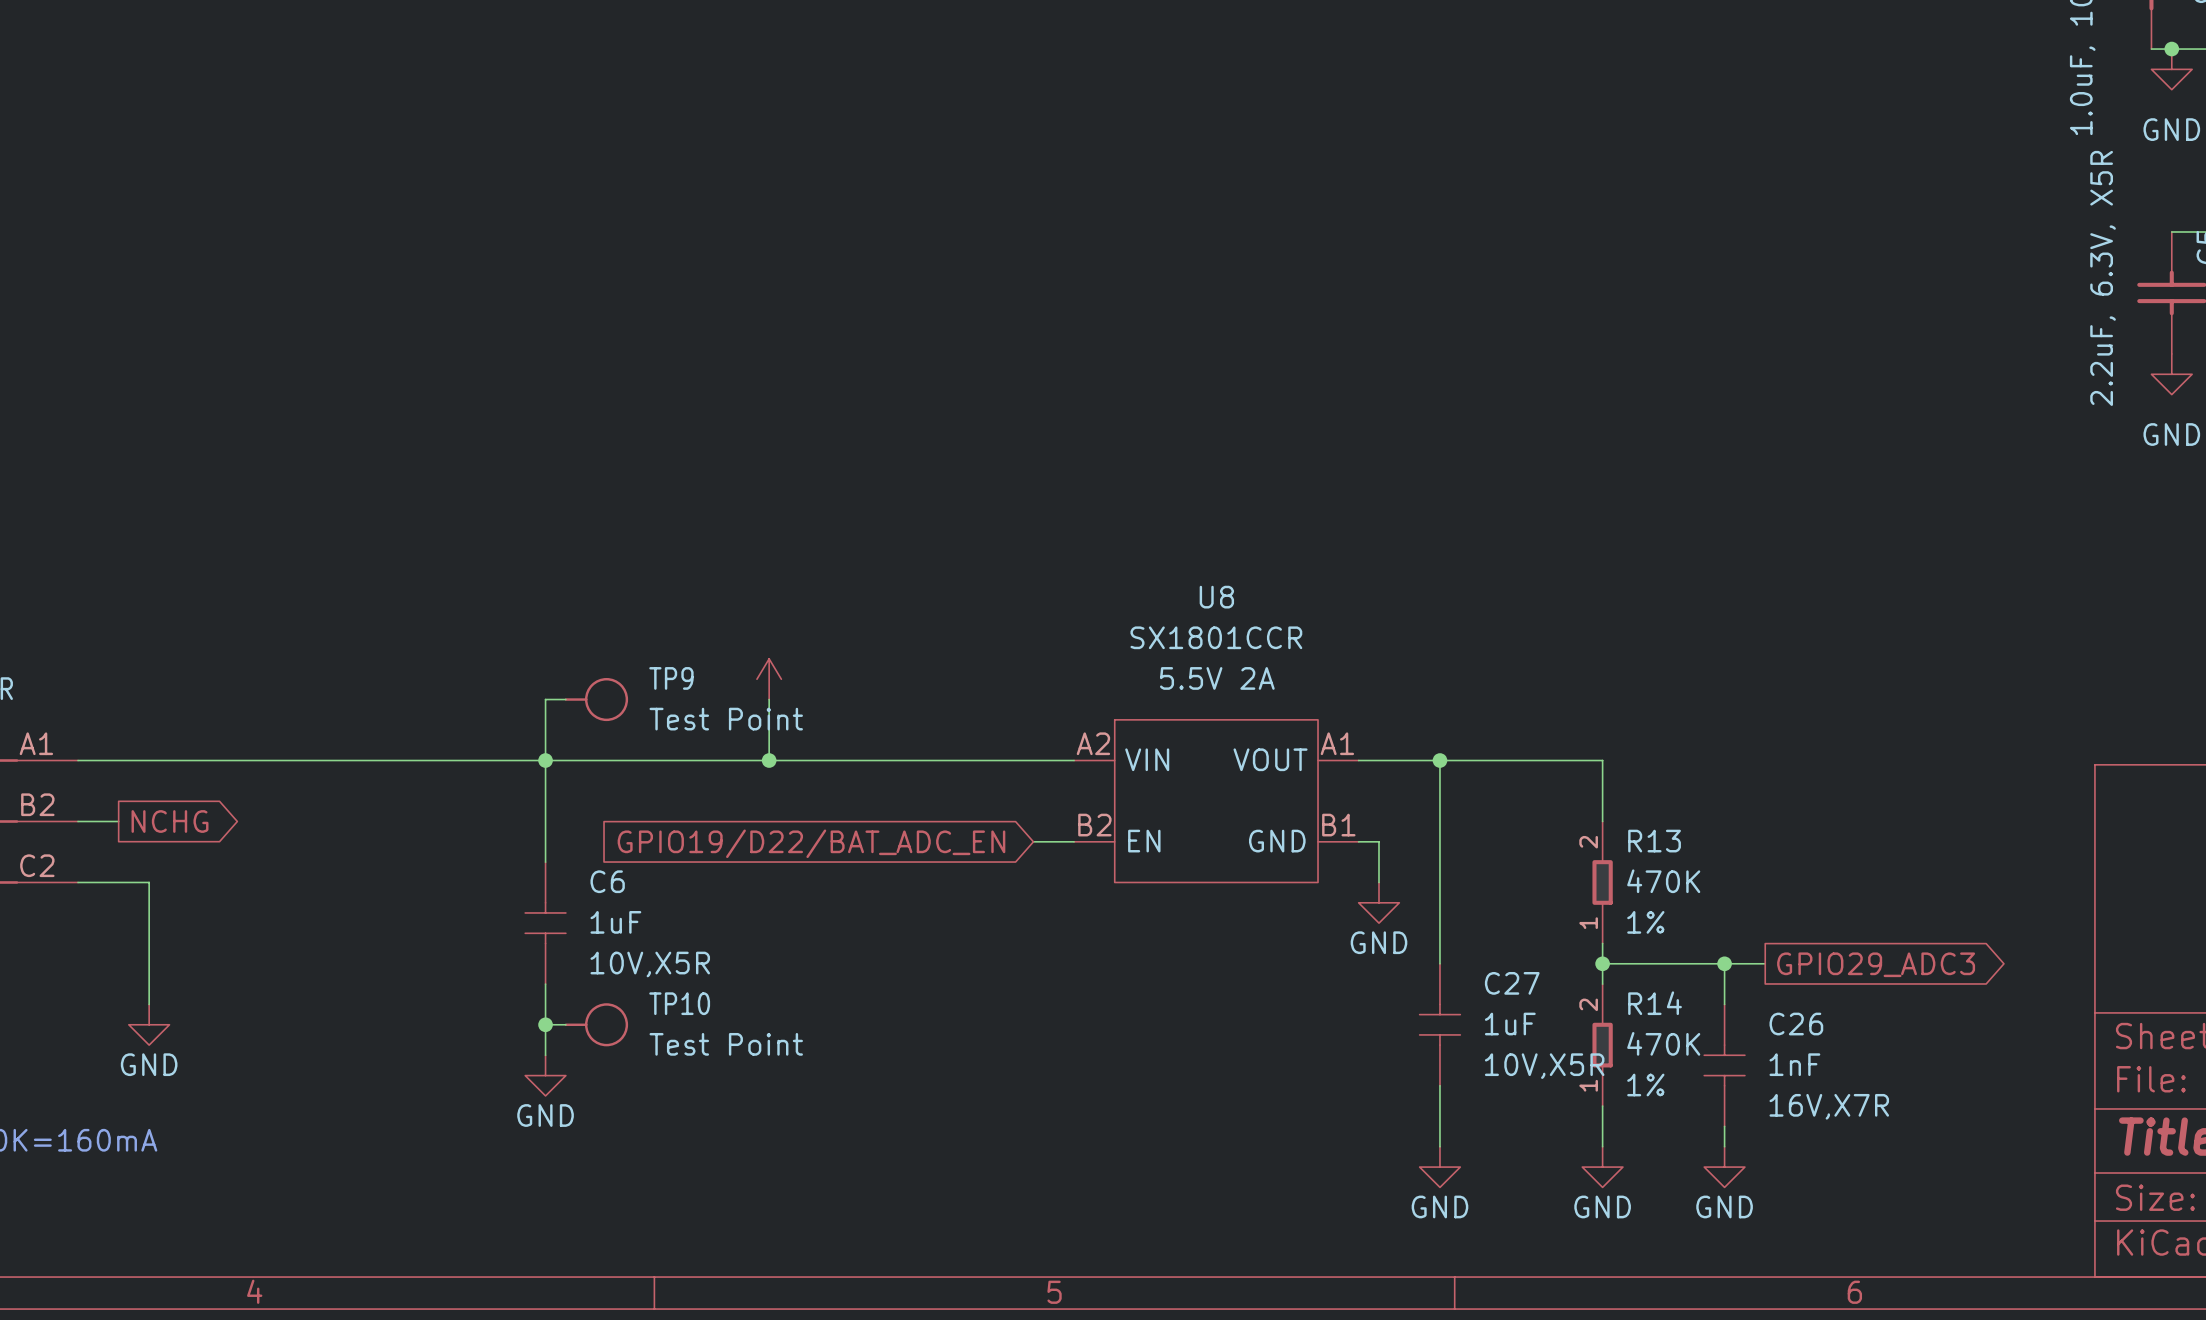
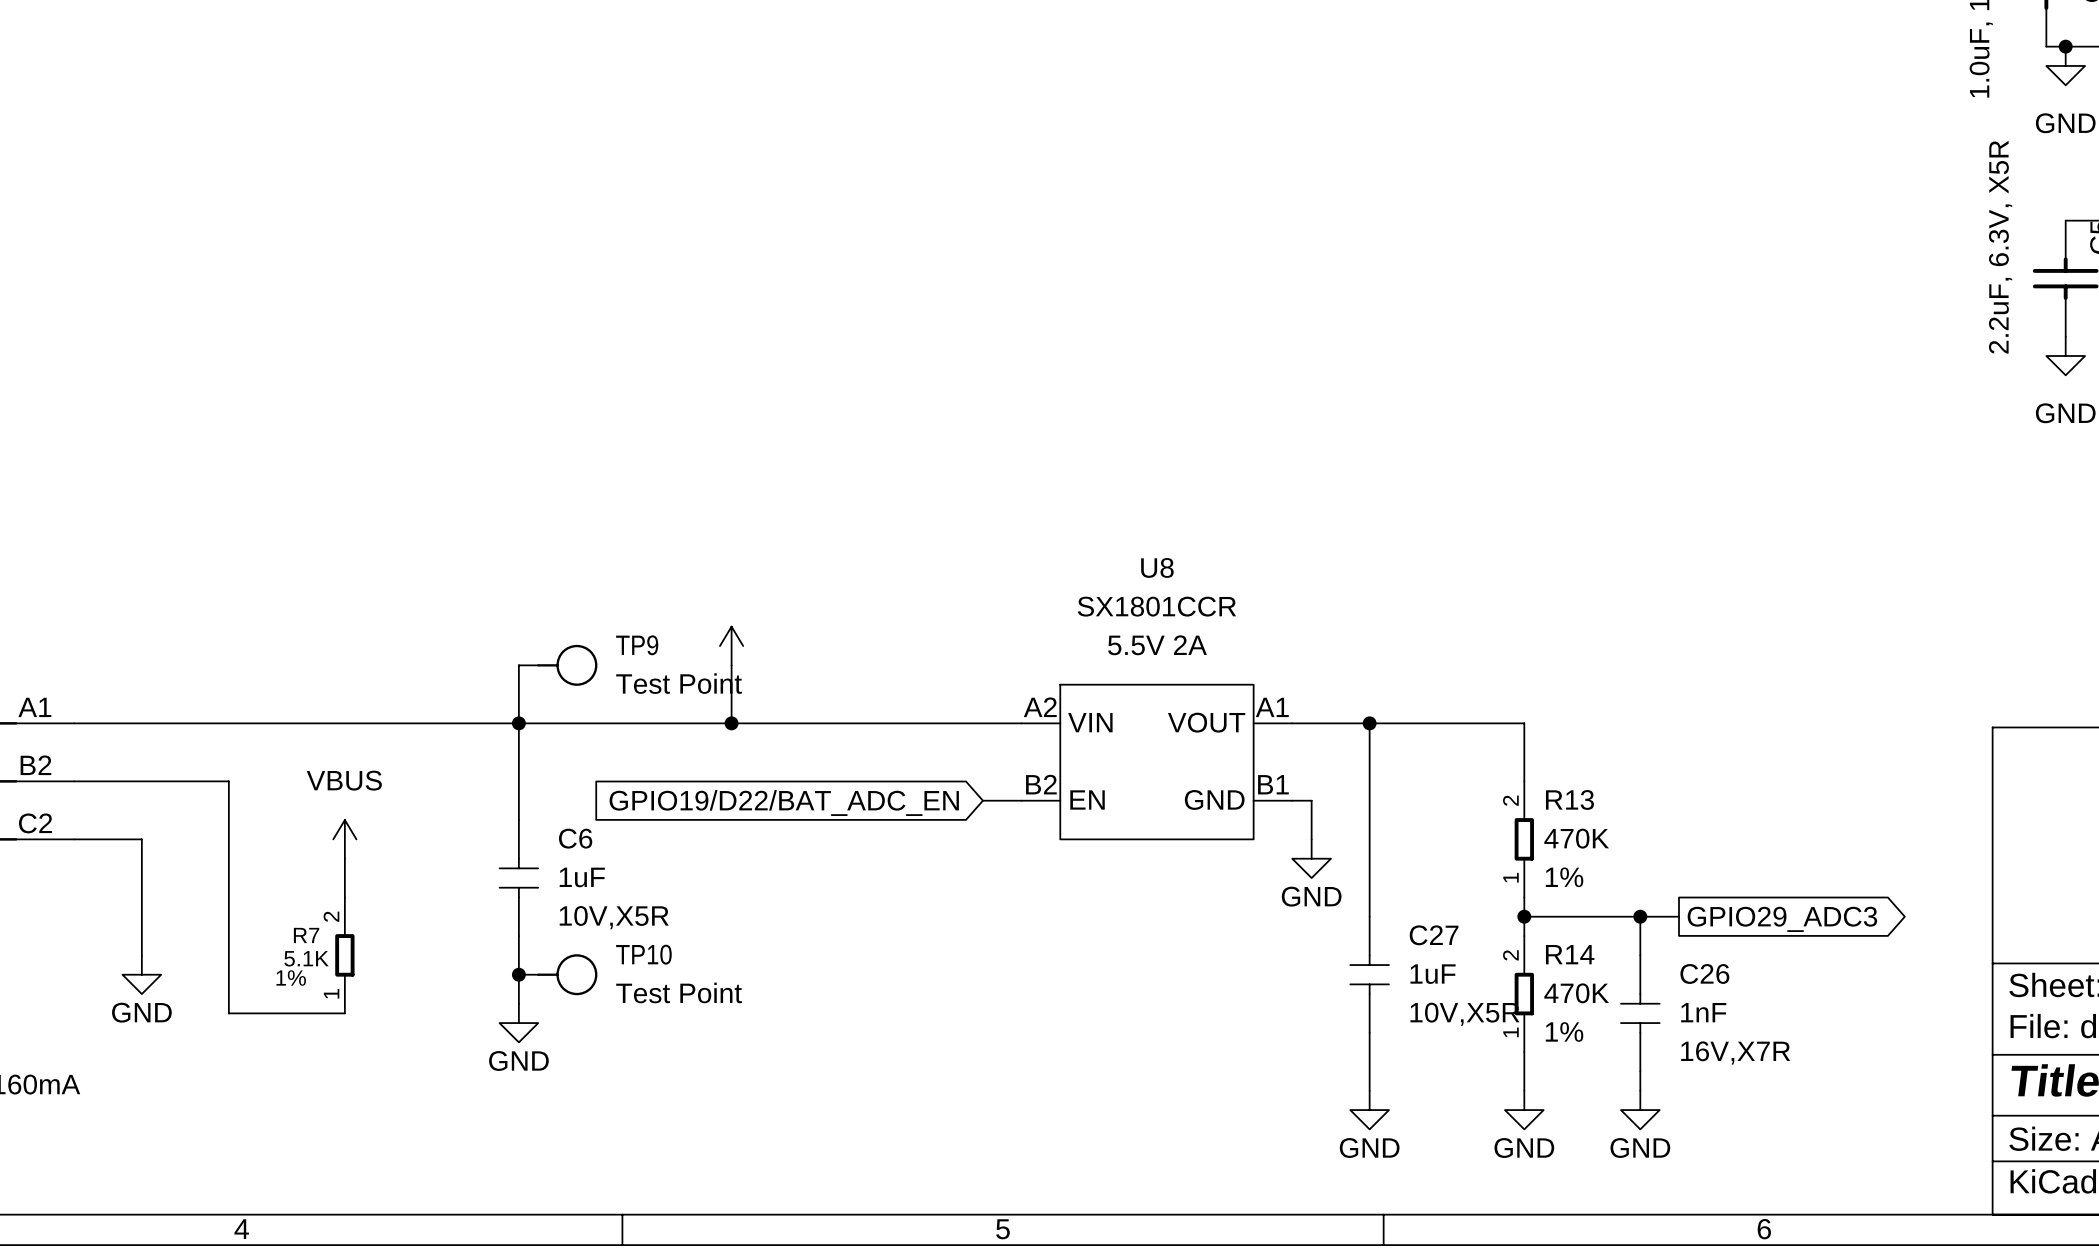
wire: none -> (112, 781) (228, 781) (228, 1013) (344, 1013)
global label: NCHG (170, 821) -> none
power symbol: none -> VBUS (344, 839)
wire: none -> (344, 858) (344, 897)
R7: none -> 5.1K (344, 955)

